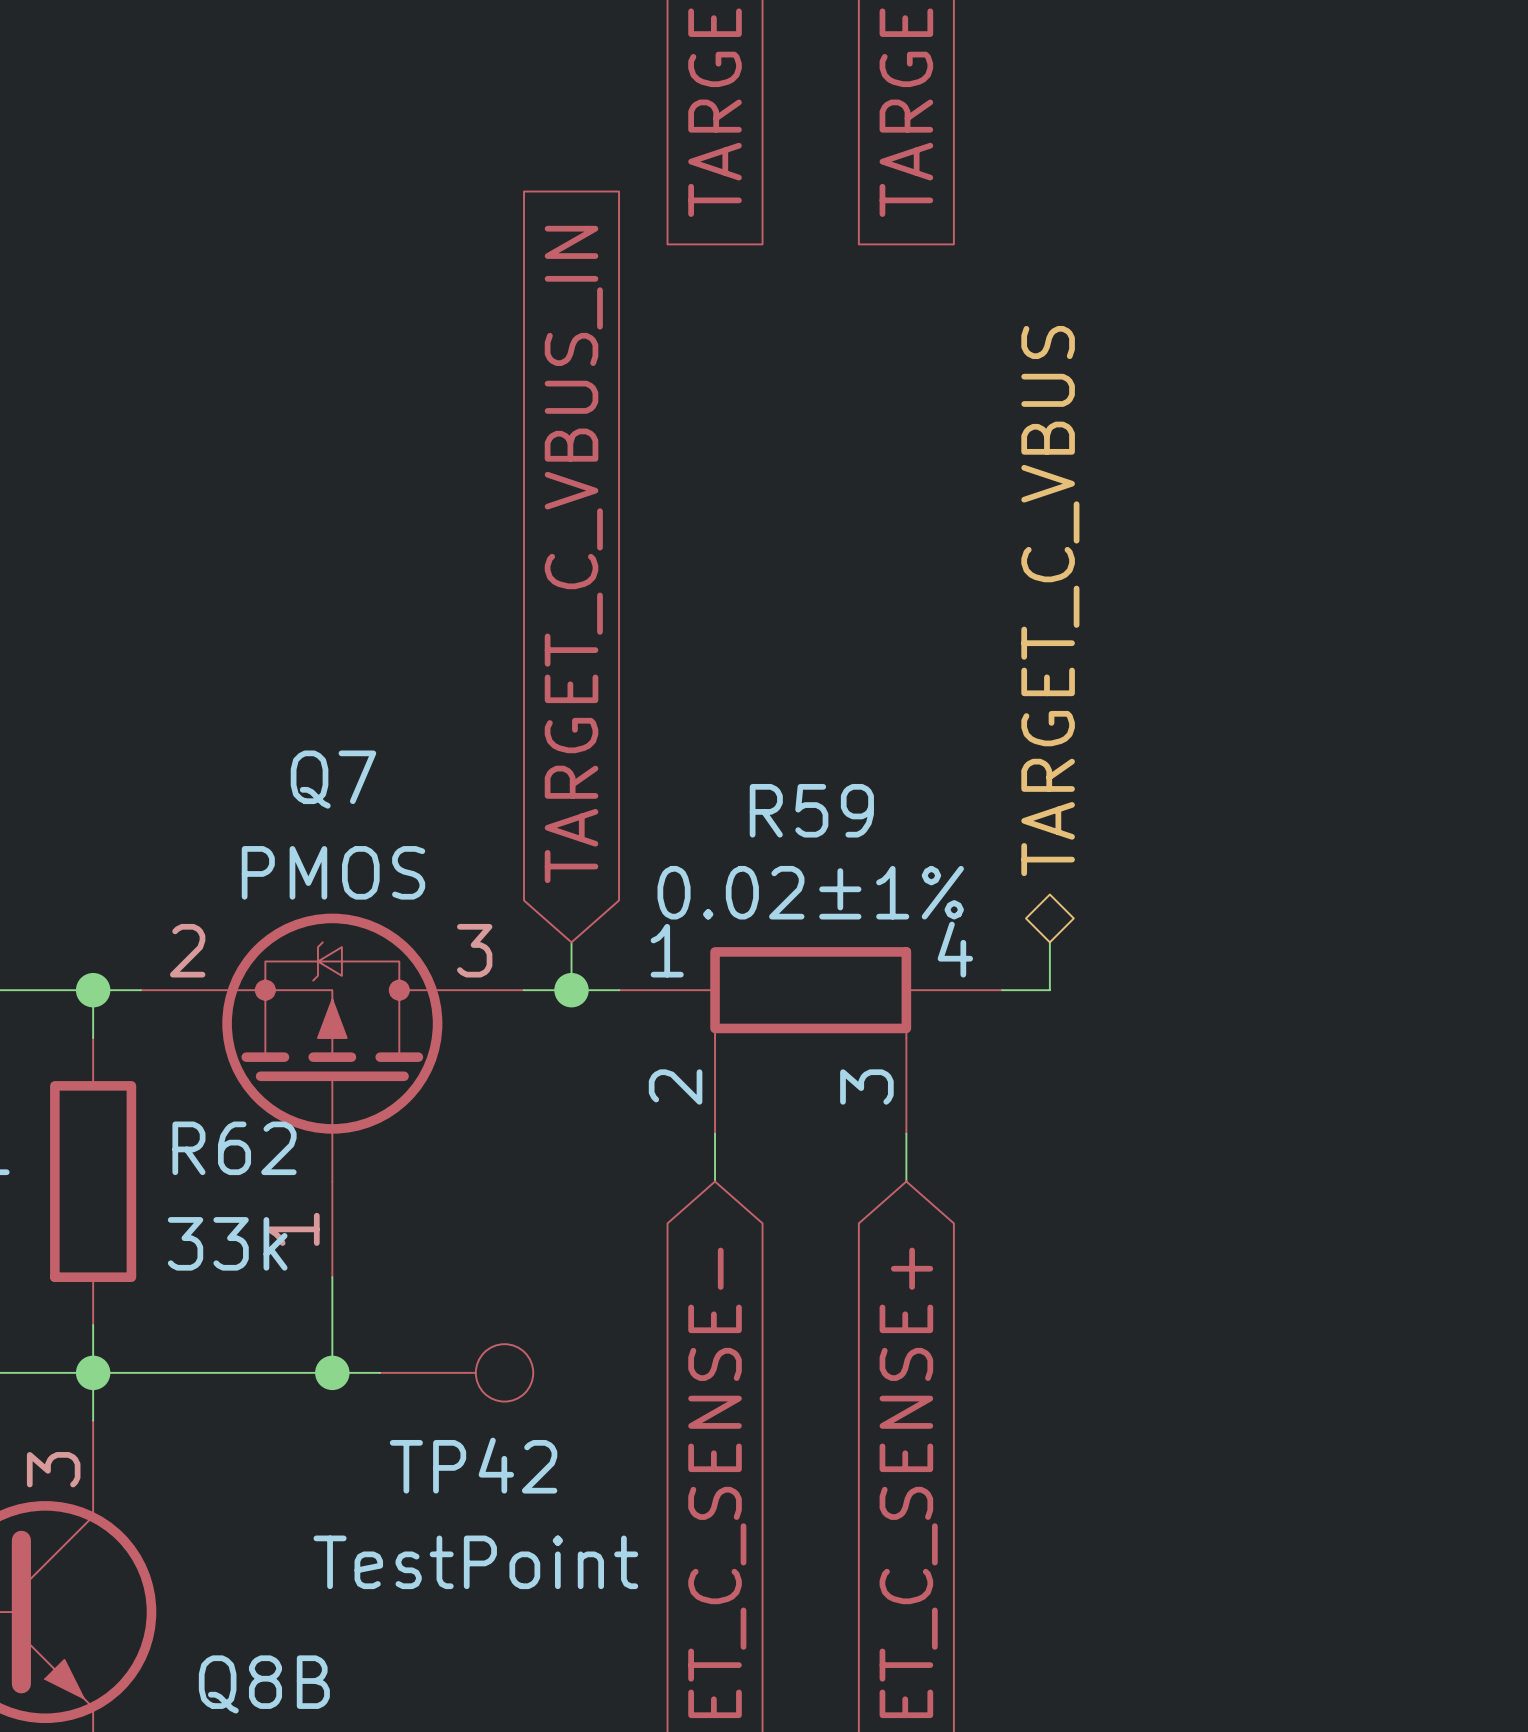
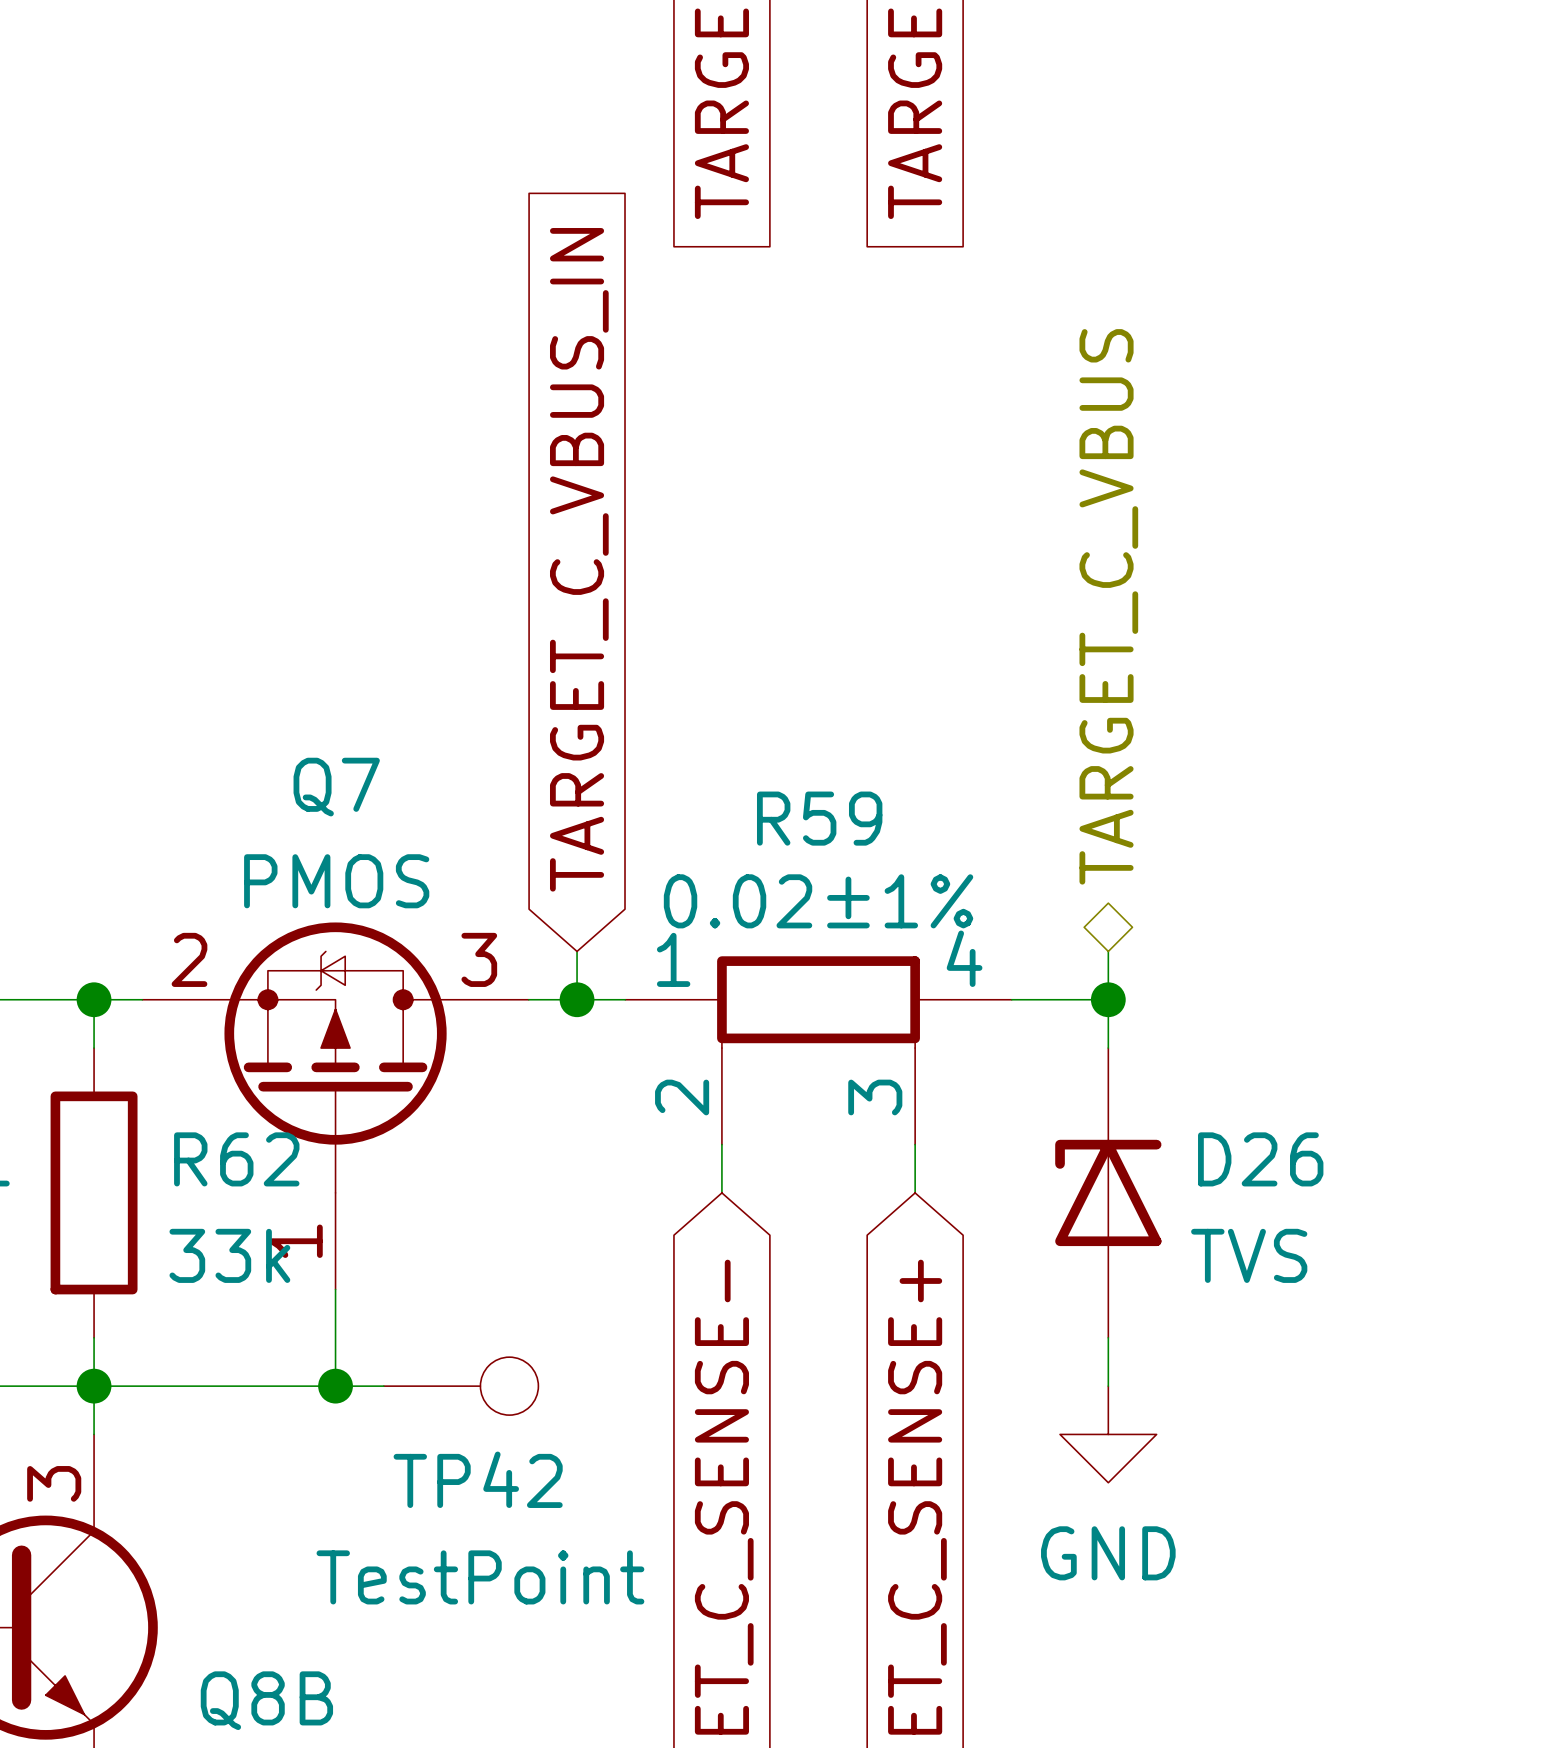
hierarchical label position: TARGET_C_VBUS (1050, 601) -> TARGET_C_VBUS (1108, 606)
wire: (1049, 942) (1049, 990) -> (1108, 999) (1060, 999)
wire: none -> (1108, 951) (1108, 1048)
junction: none -> (1108, 999)
D26: none -> TVS (1108, 1192)
wire: none -> (1108, 1337) (1108, 1386)
power symbol: none -> GND (1108, 1434)

